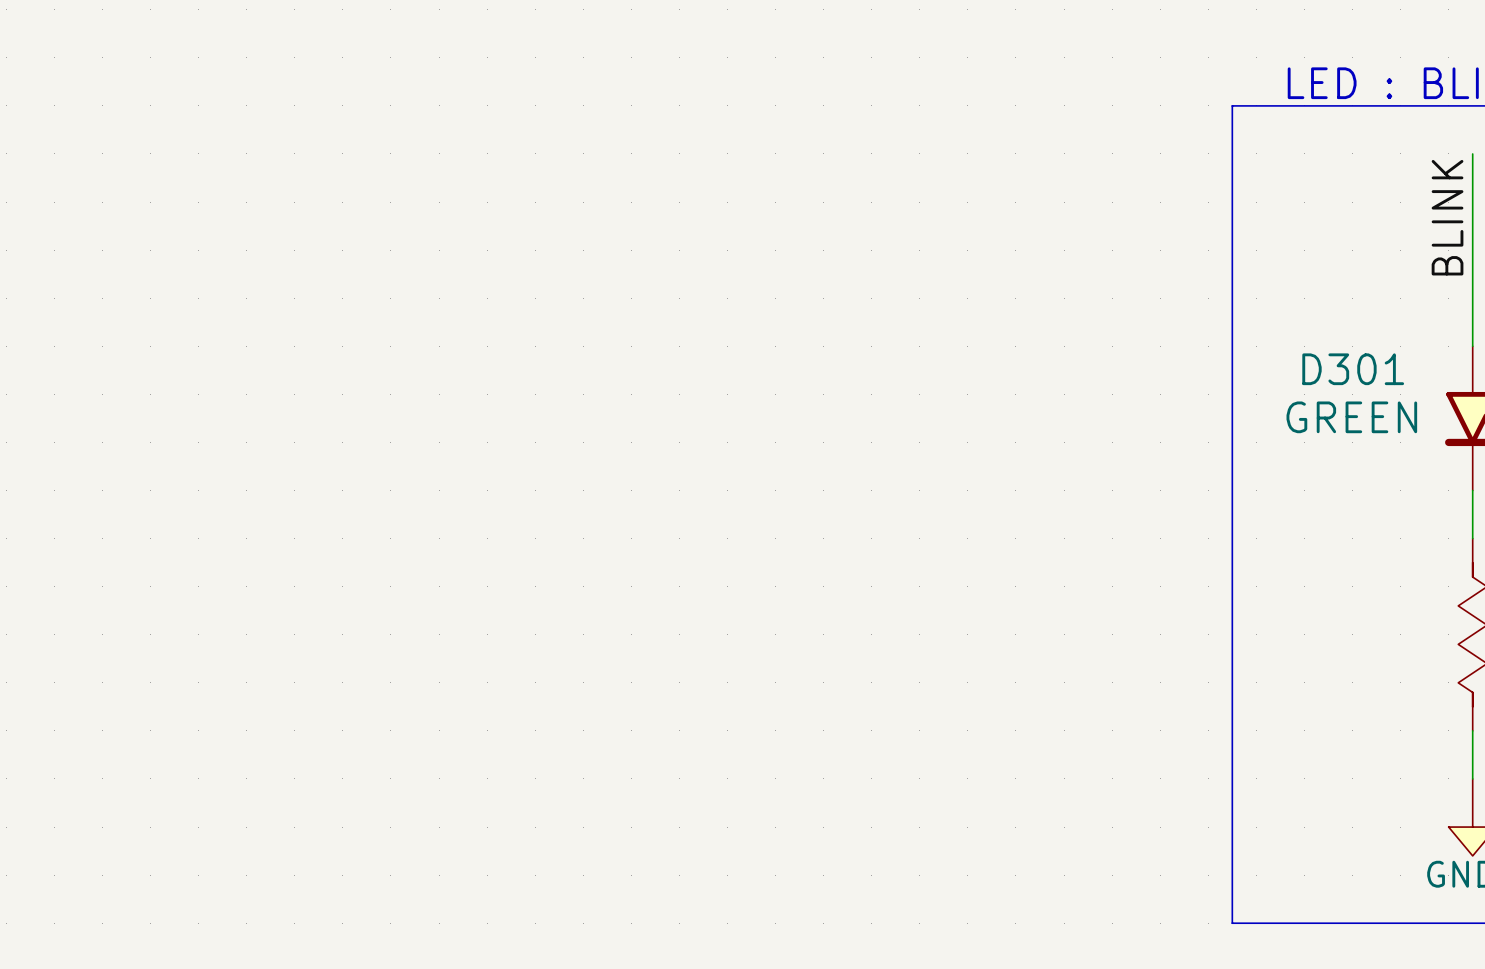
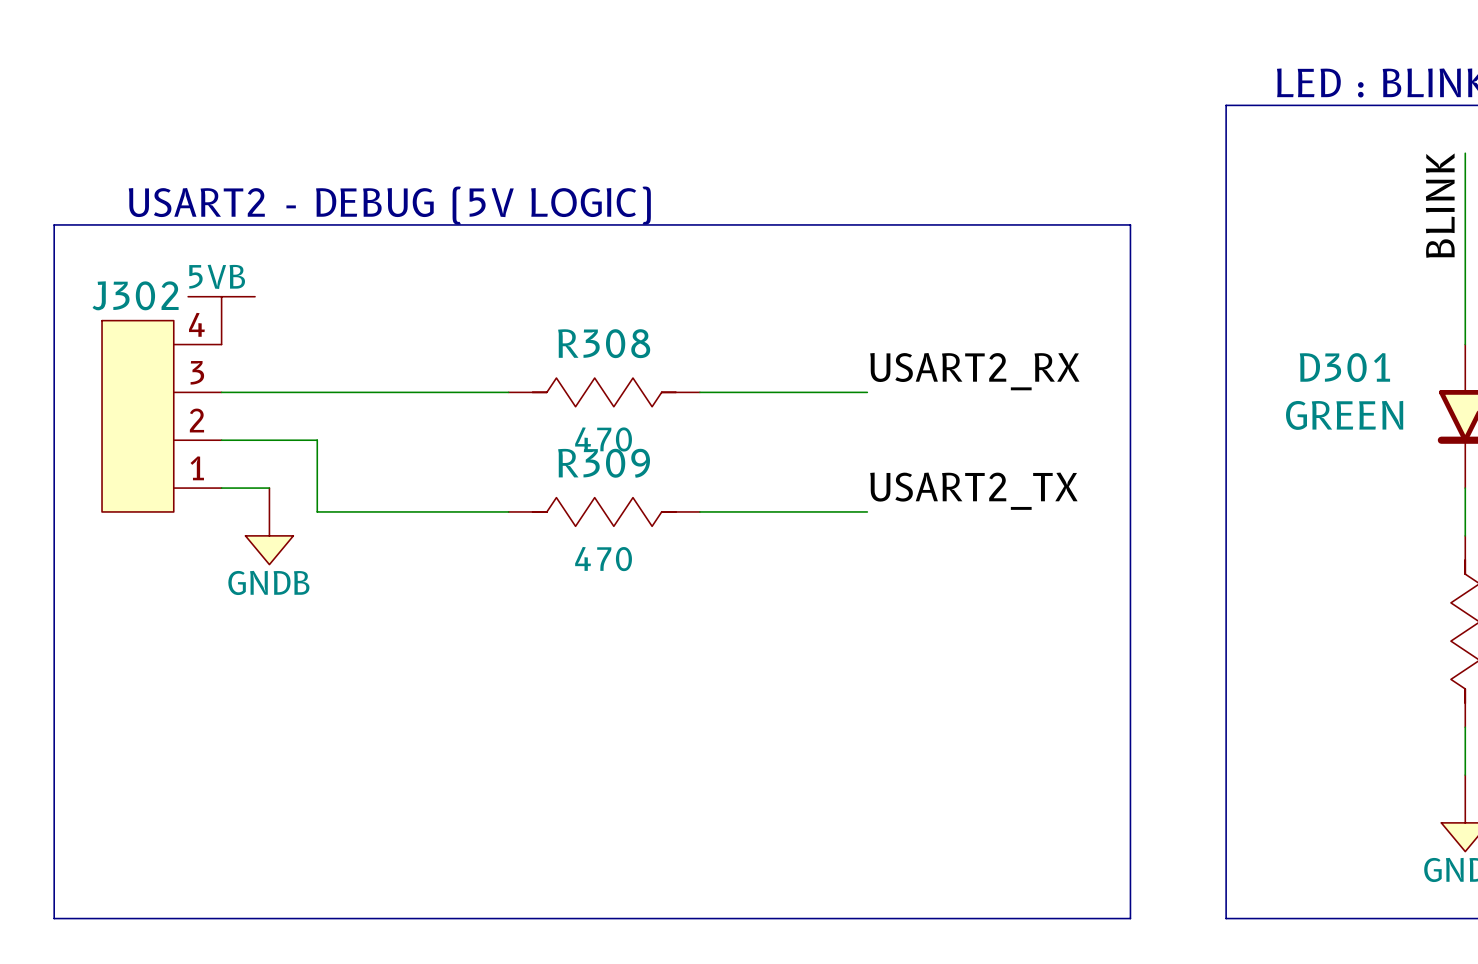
text: none -> USART2 - DEBUG (5V LOGIC) (389, 205)
line: none -> (54, 224) (54, 918) (1130, 918) (1130, 224) (54, 224)
power symbol: none -> 5VB (221, 320)
label: none -> USART2_RX (974, 371)
wire: none -> (221, 392) (508, 392)
R308: none -> (604, 392)
wire: none -> (699, 392) (867, 392)
J302: none -> (161, 416)
wire: none -> (221, 440) (317, 440) (317, 511) (508, 511)
wire: none -> (221, 488) (269, 488)
label: none -> USART2_TX (973, 491)
R309: none -> (604, 511)
wire: none -> (699, 511) (867, 511)
power symbol: none -> GNDB (269, 526)

